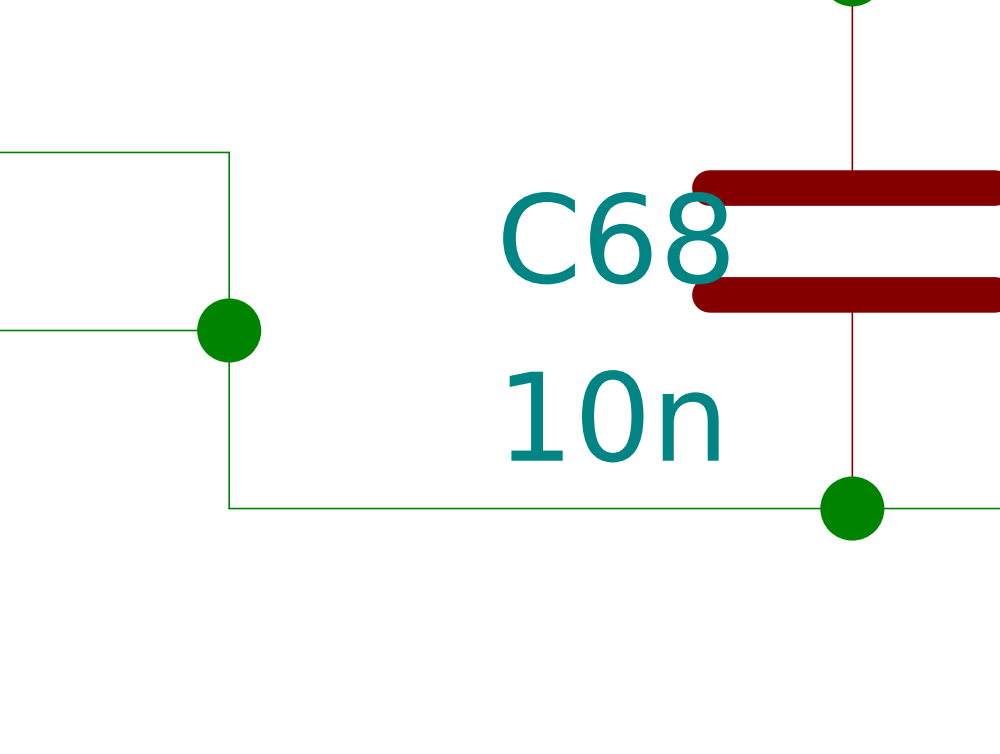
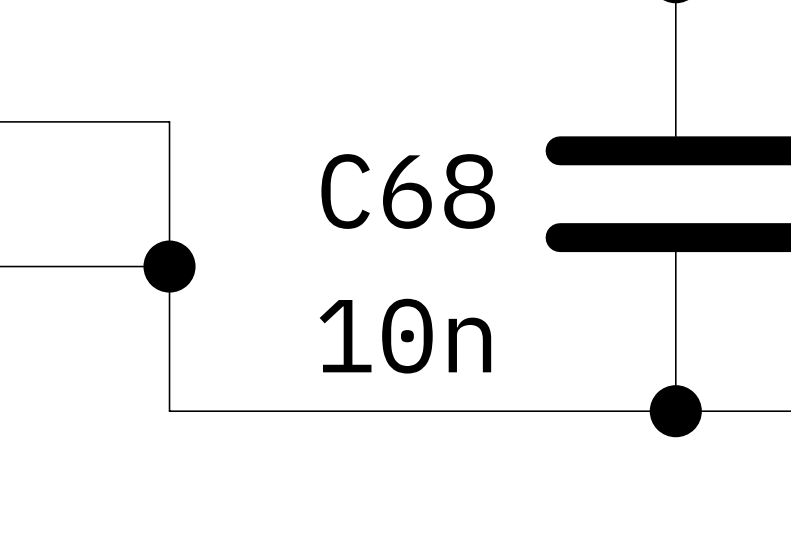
C68 name position: C68 (615, 238) -> C68 (408, 191)
C68 value position: 10n (614, 416) -> 10n (405, 336)

